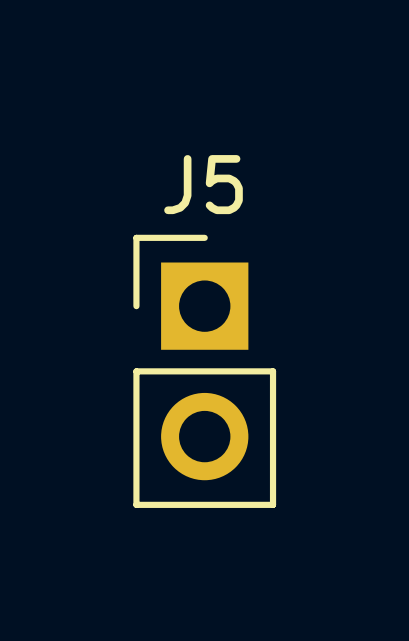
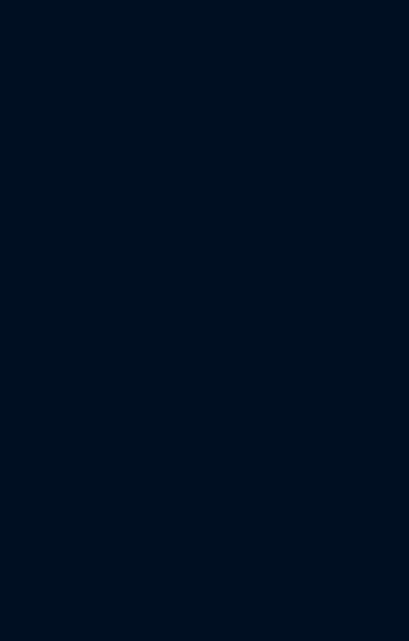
J5: (204, 371) -> none

